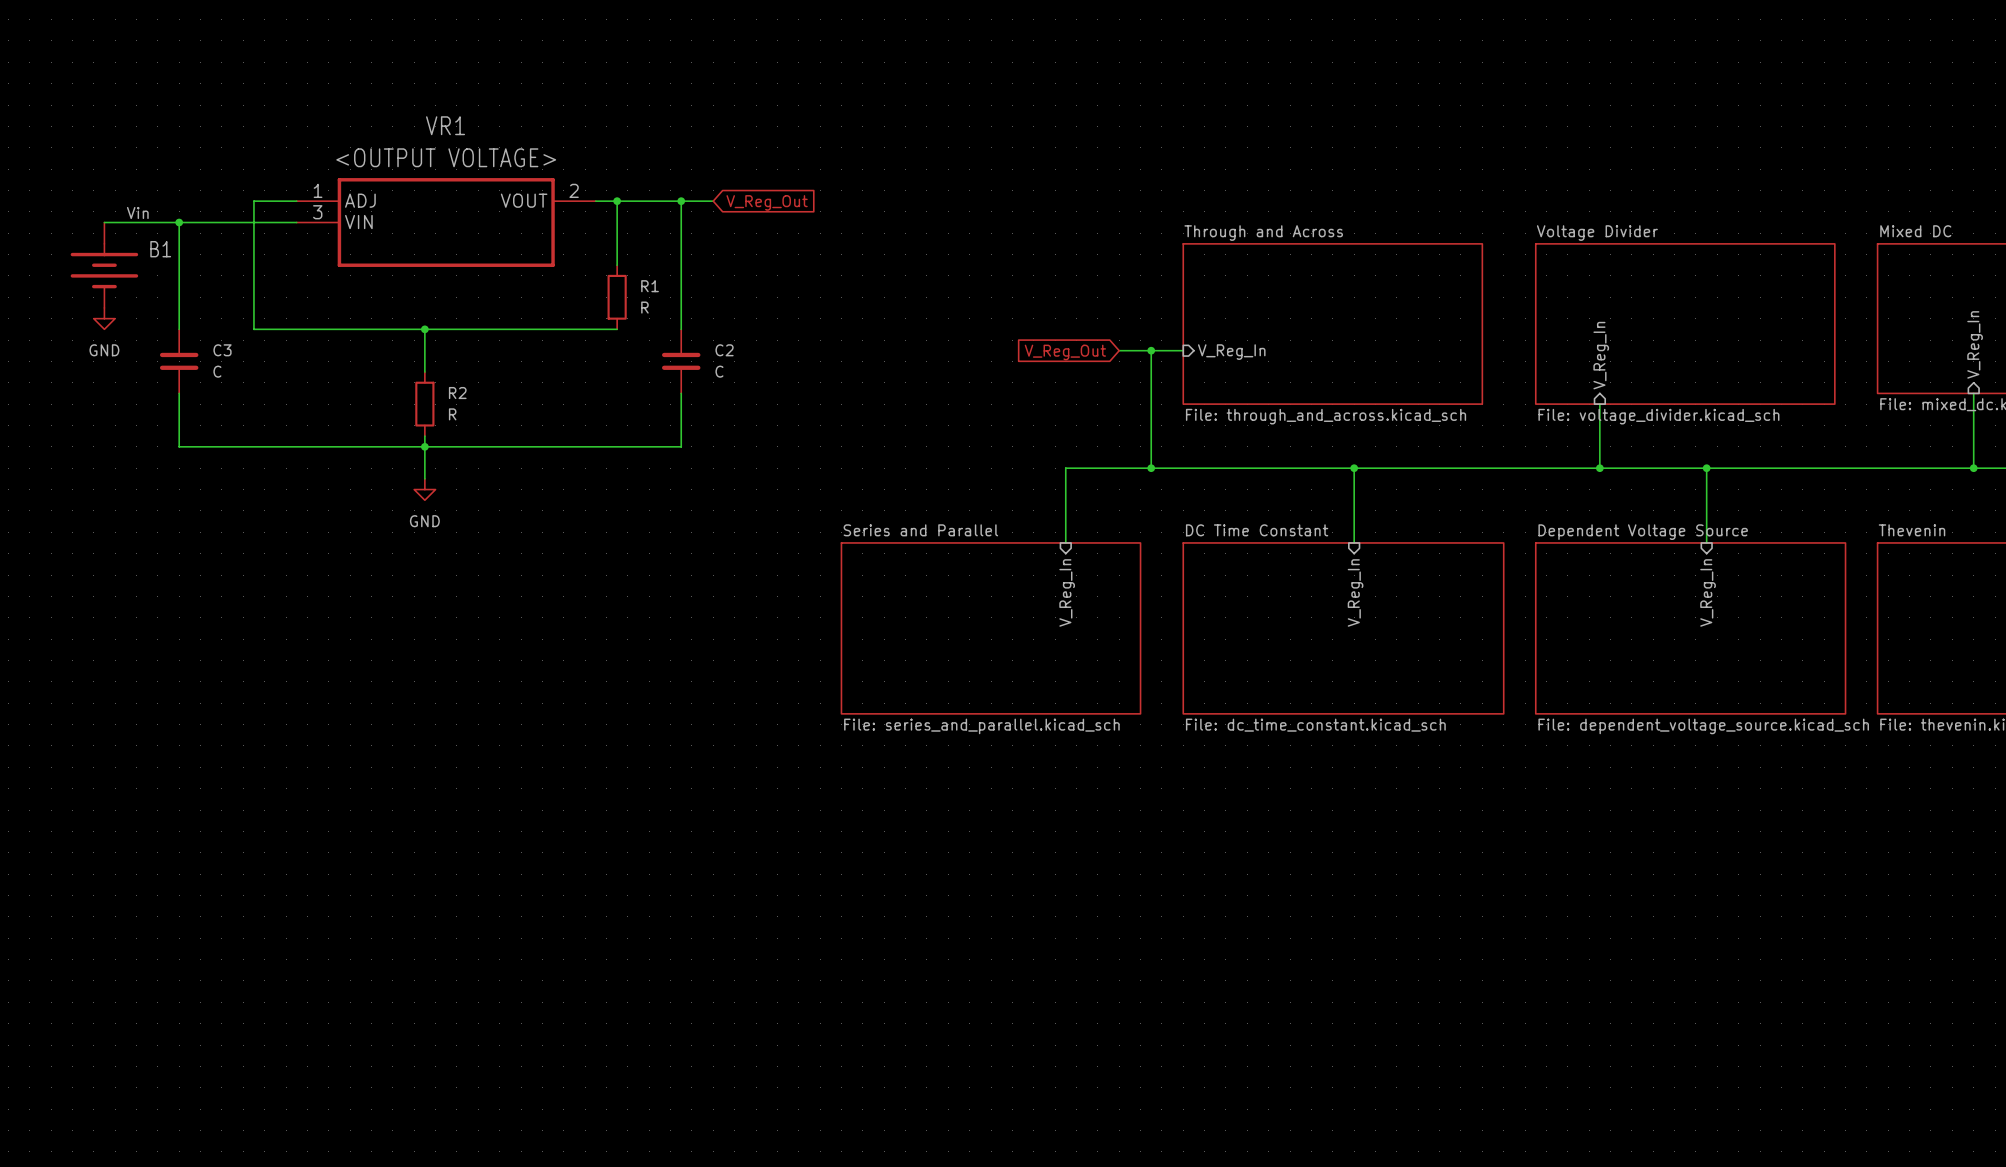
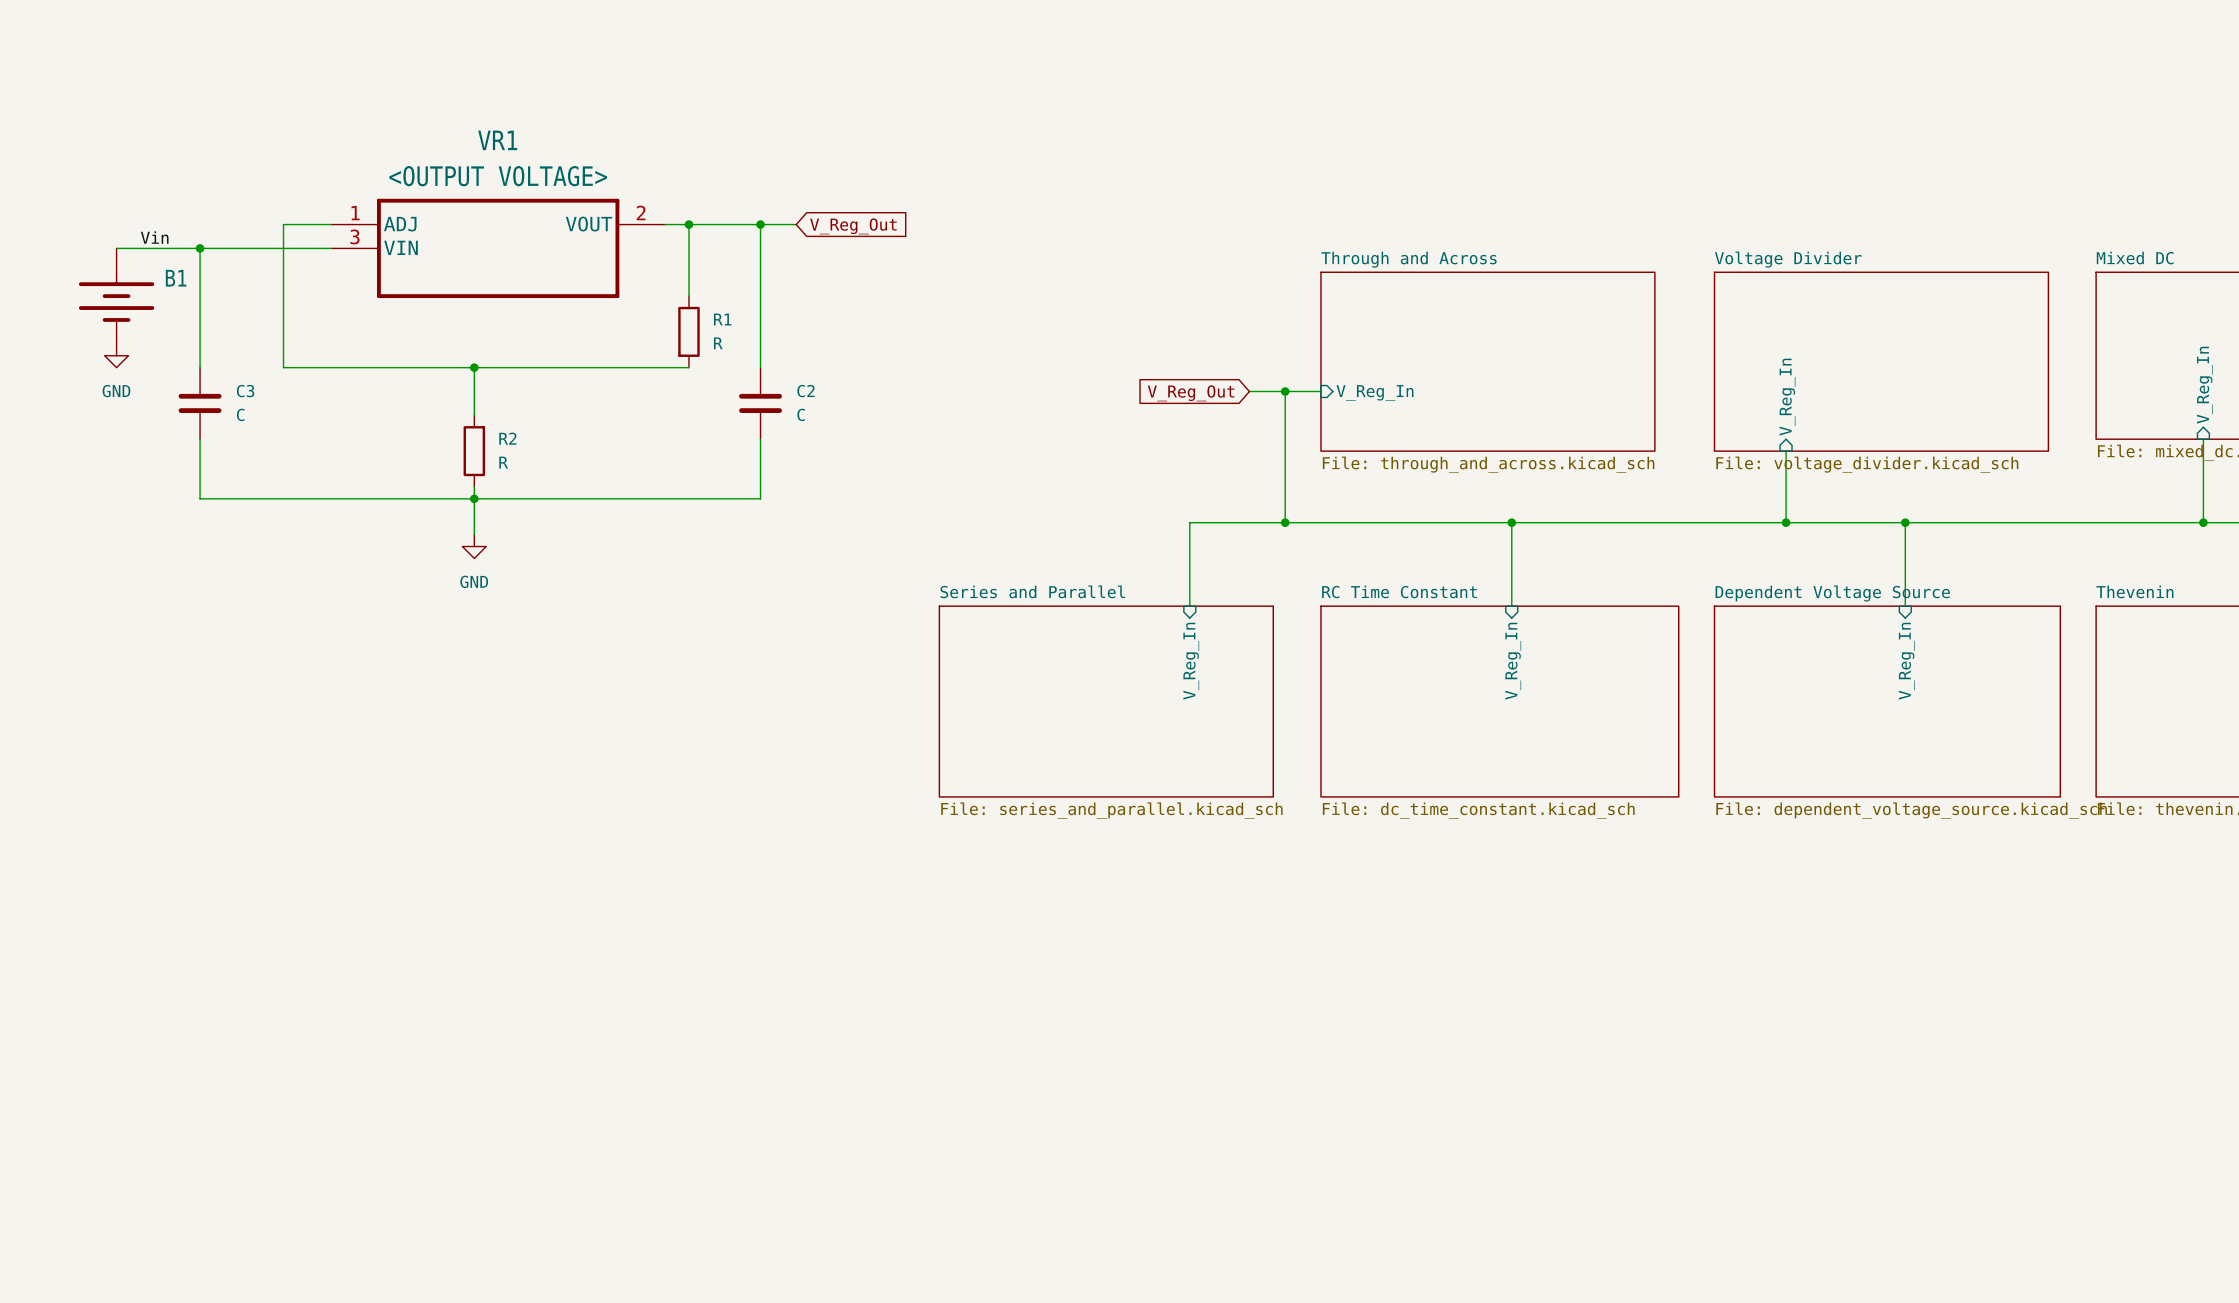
sheet DC Time Constant name: DC Time Constant (1257, 530) -> RC Time Constant (1399, 591)

